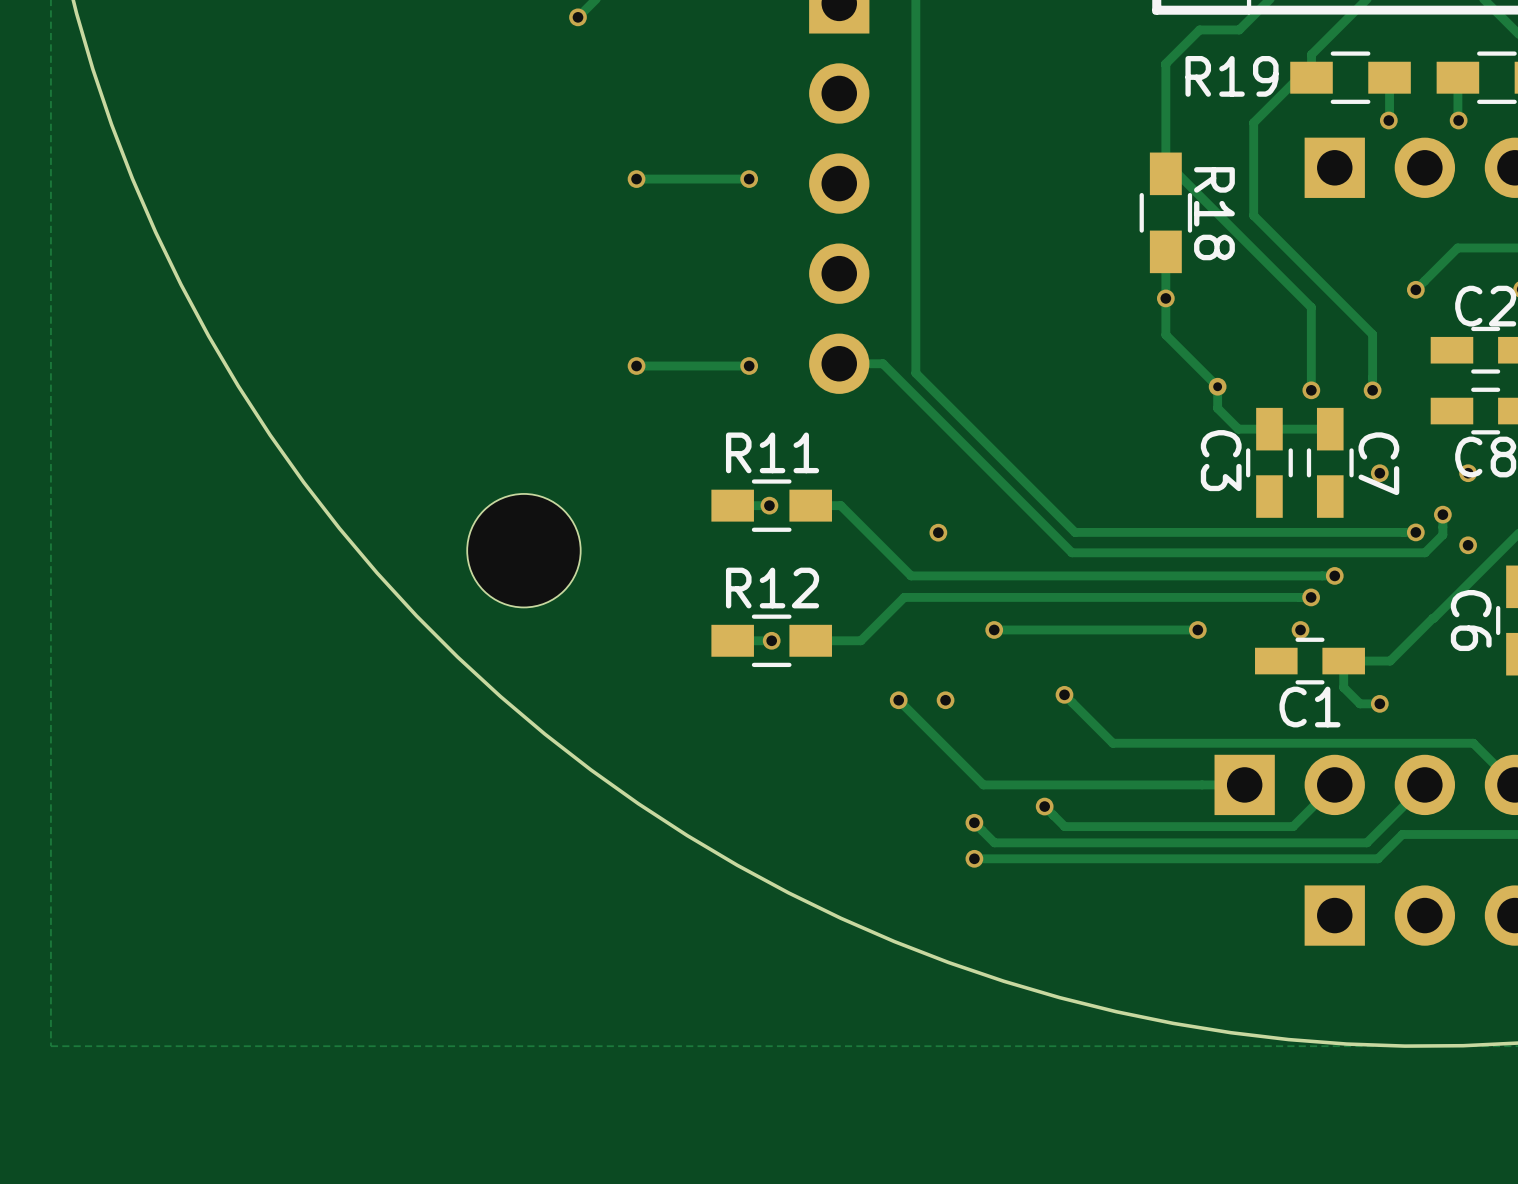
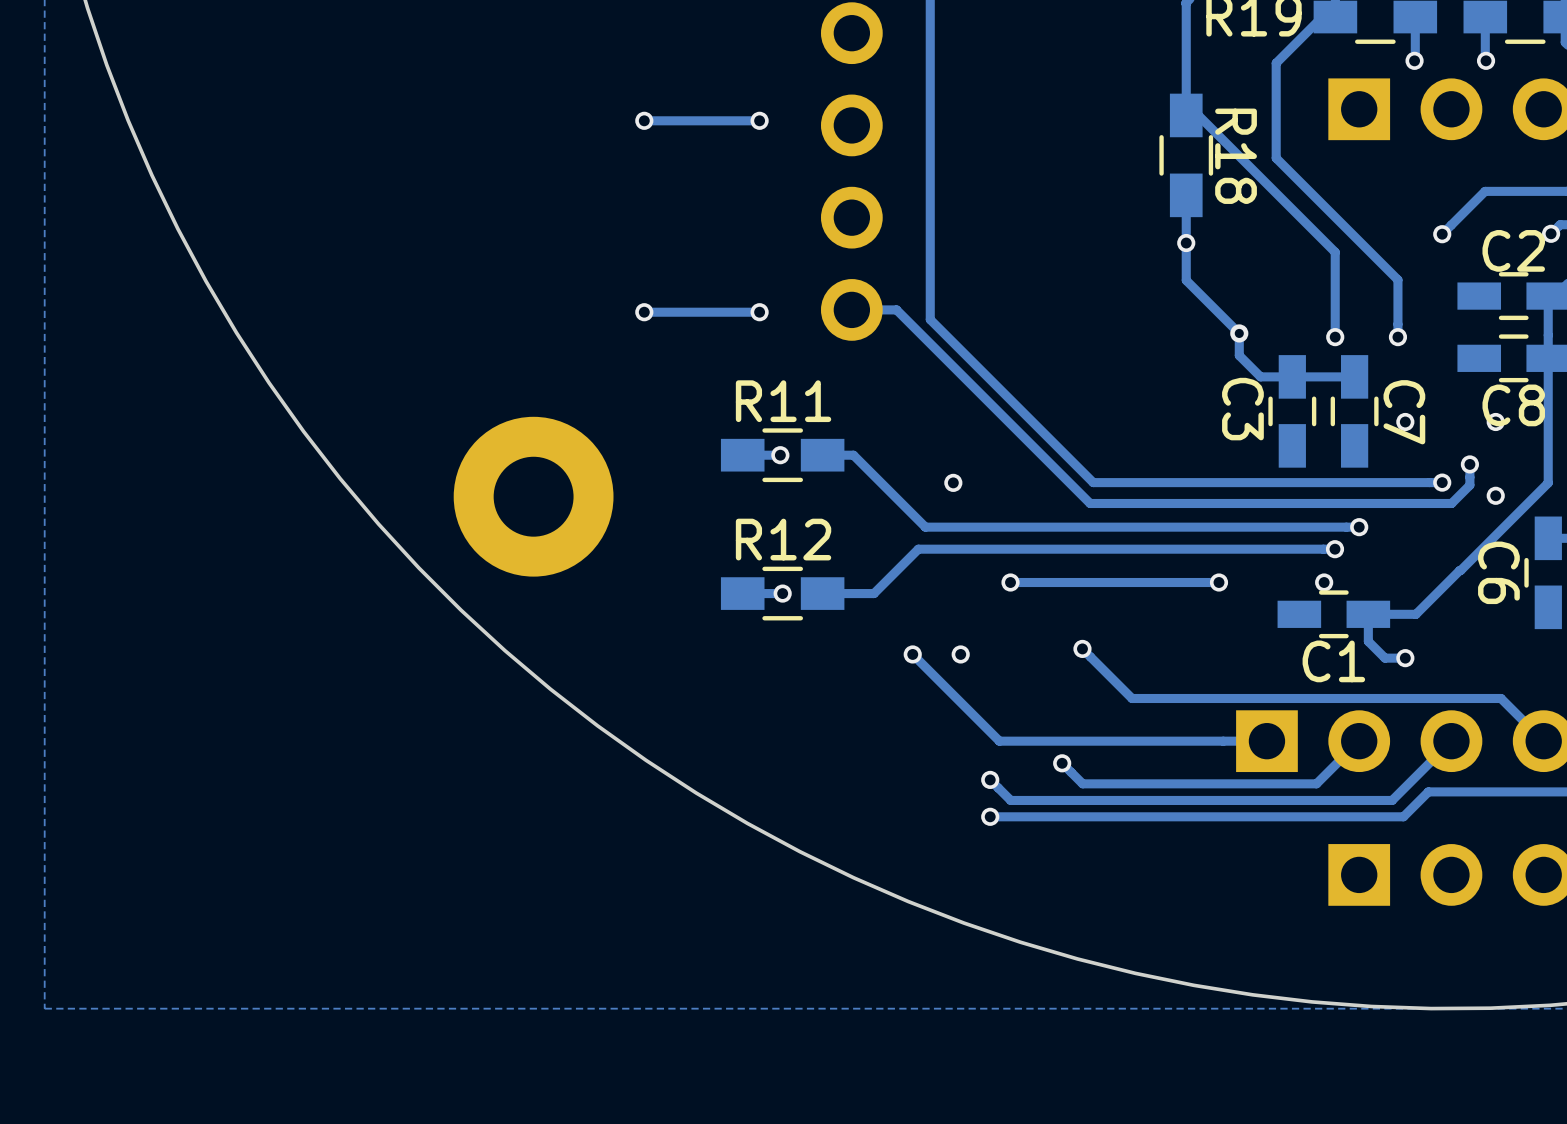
part footprint: [467, 493, 581, 608] -> [453, 416, 614, 577]

